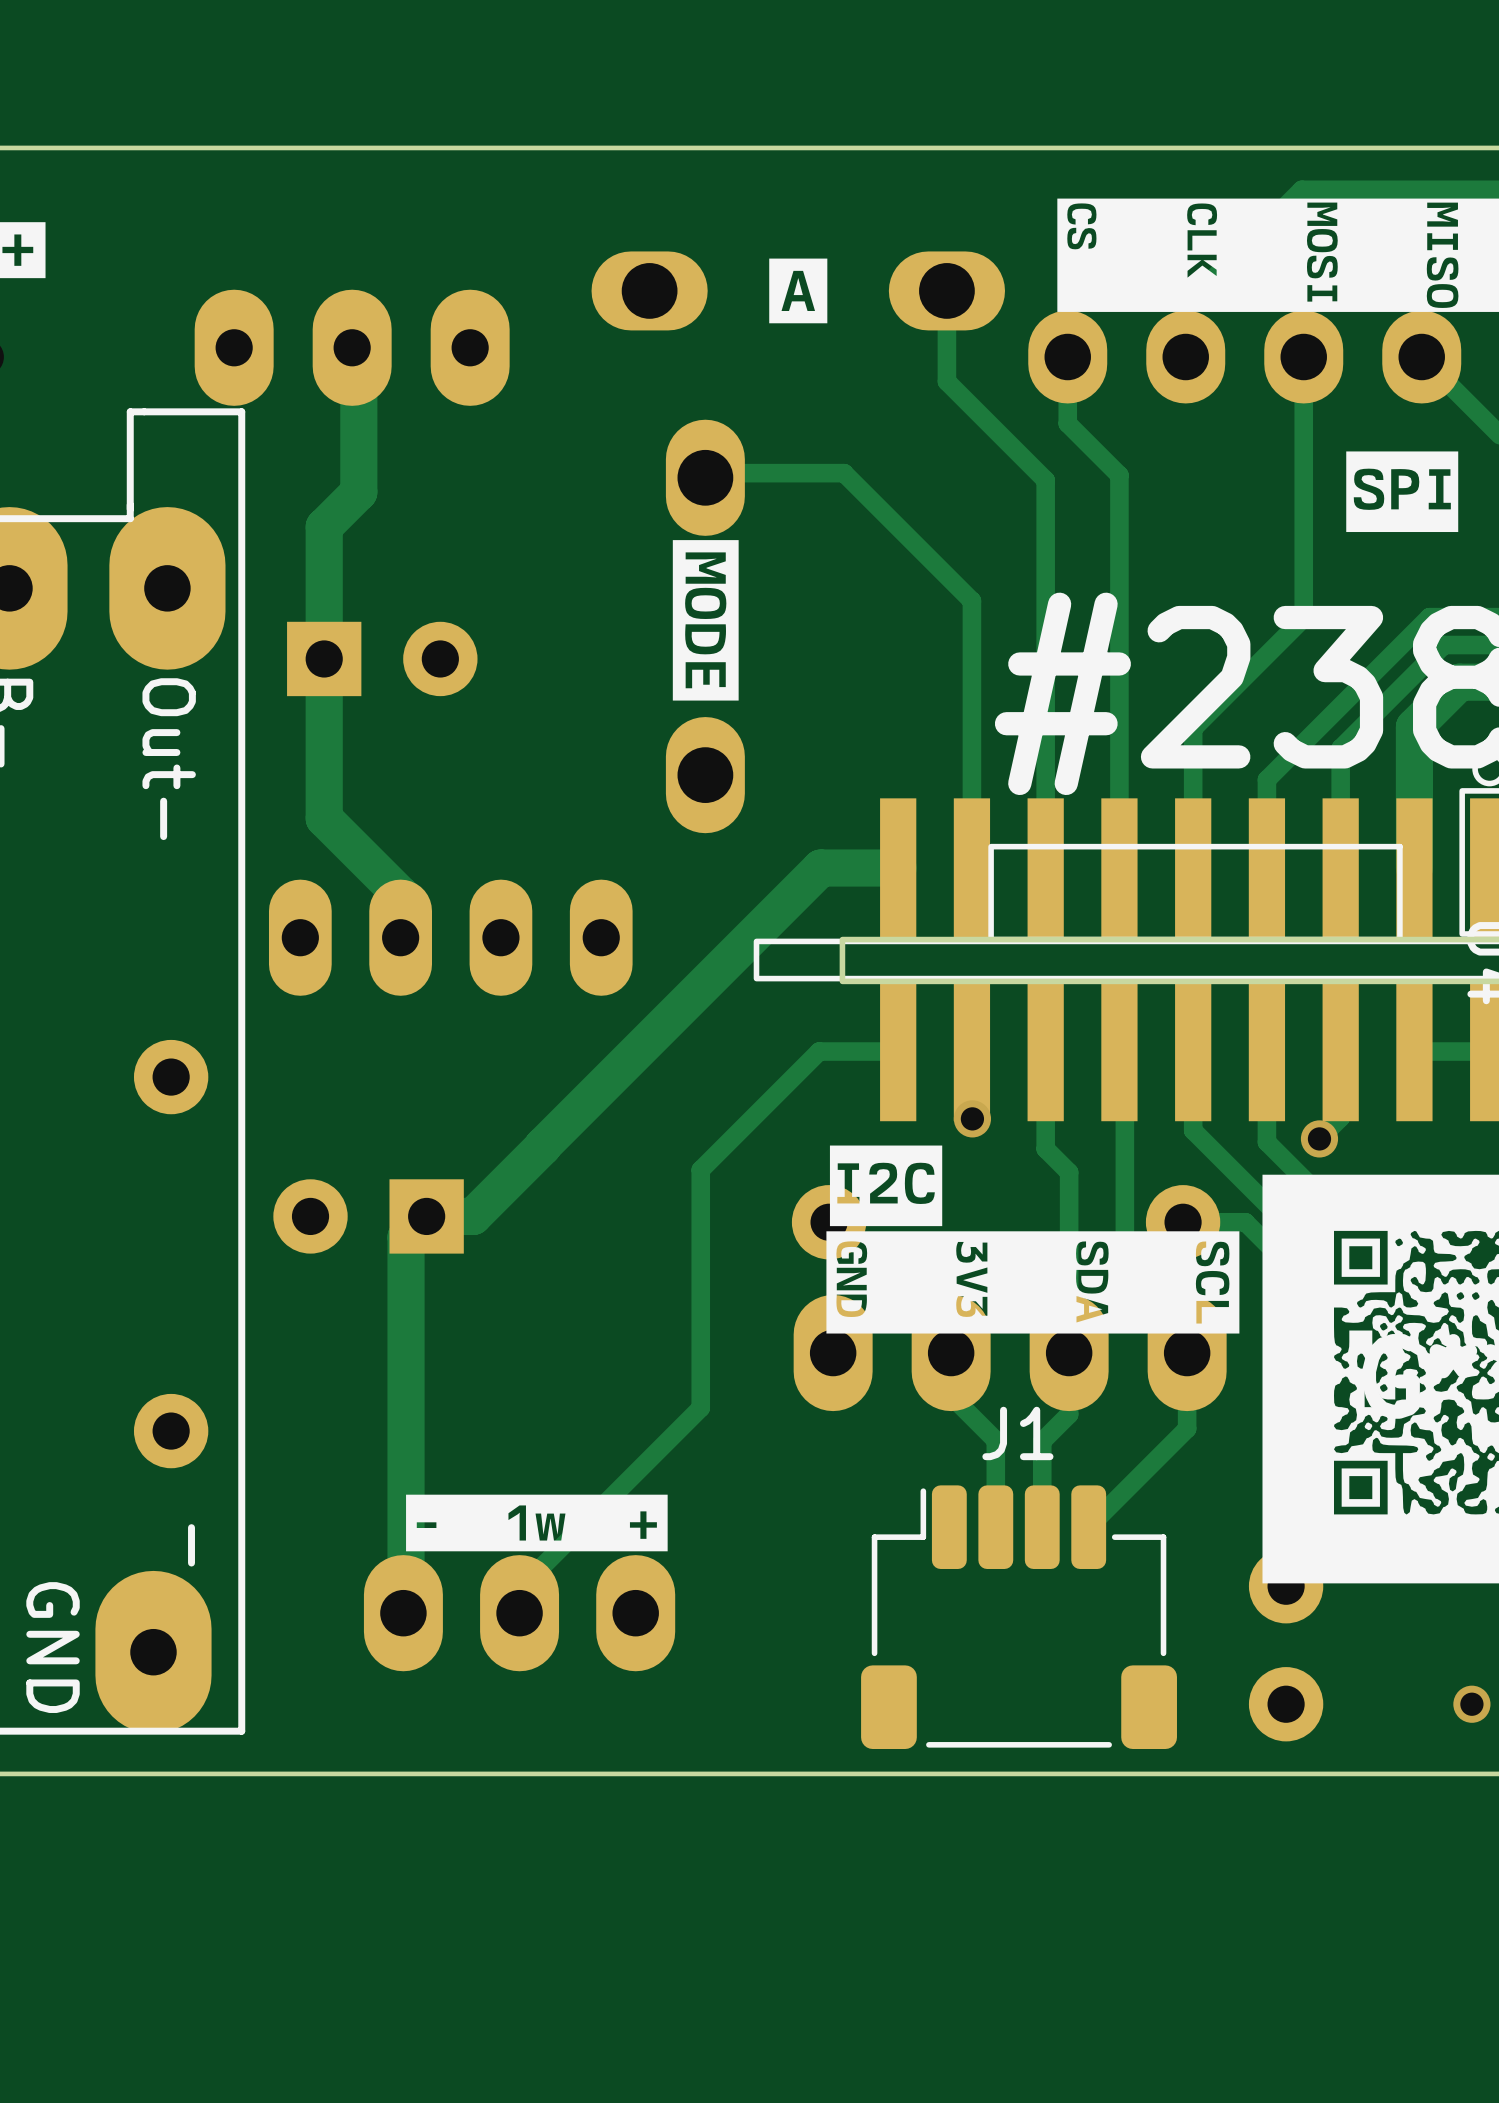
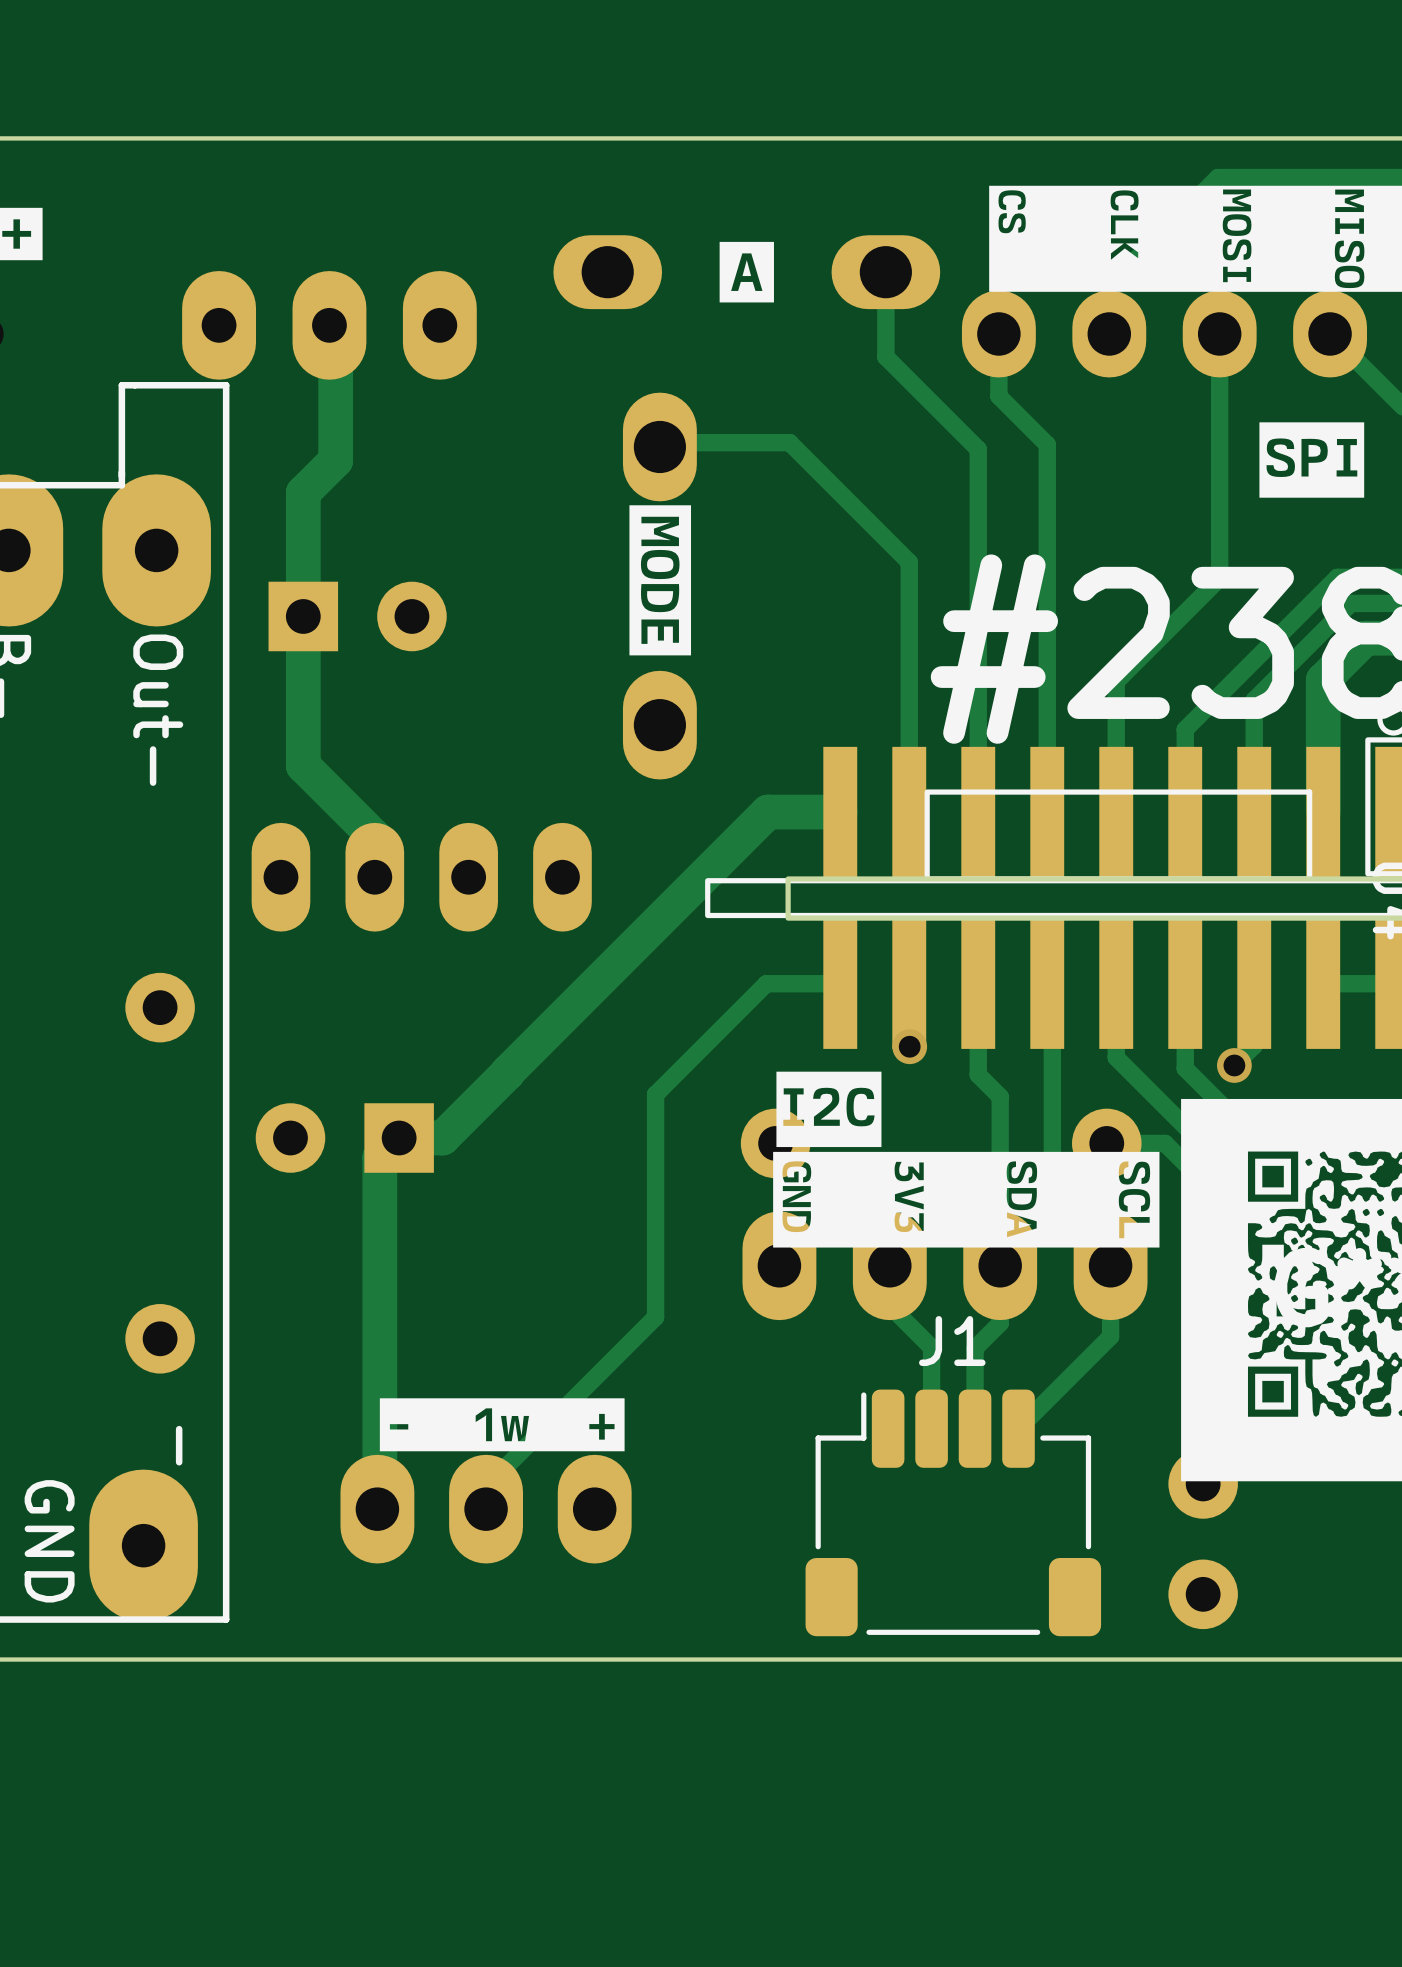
via: (1471, 1704) -> none

